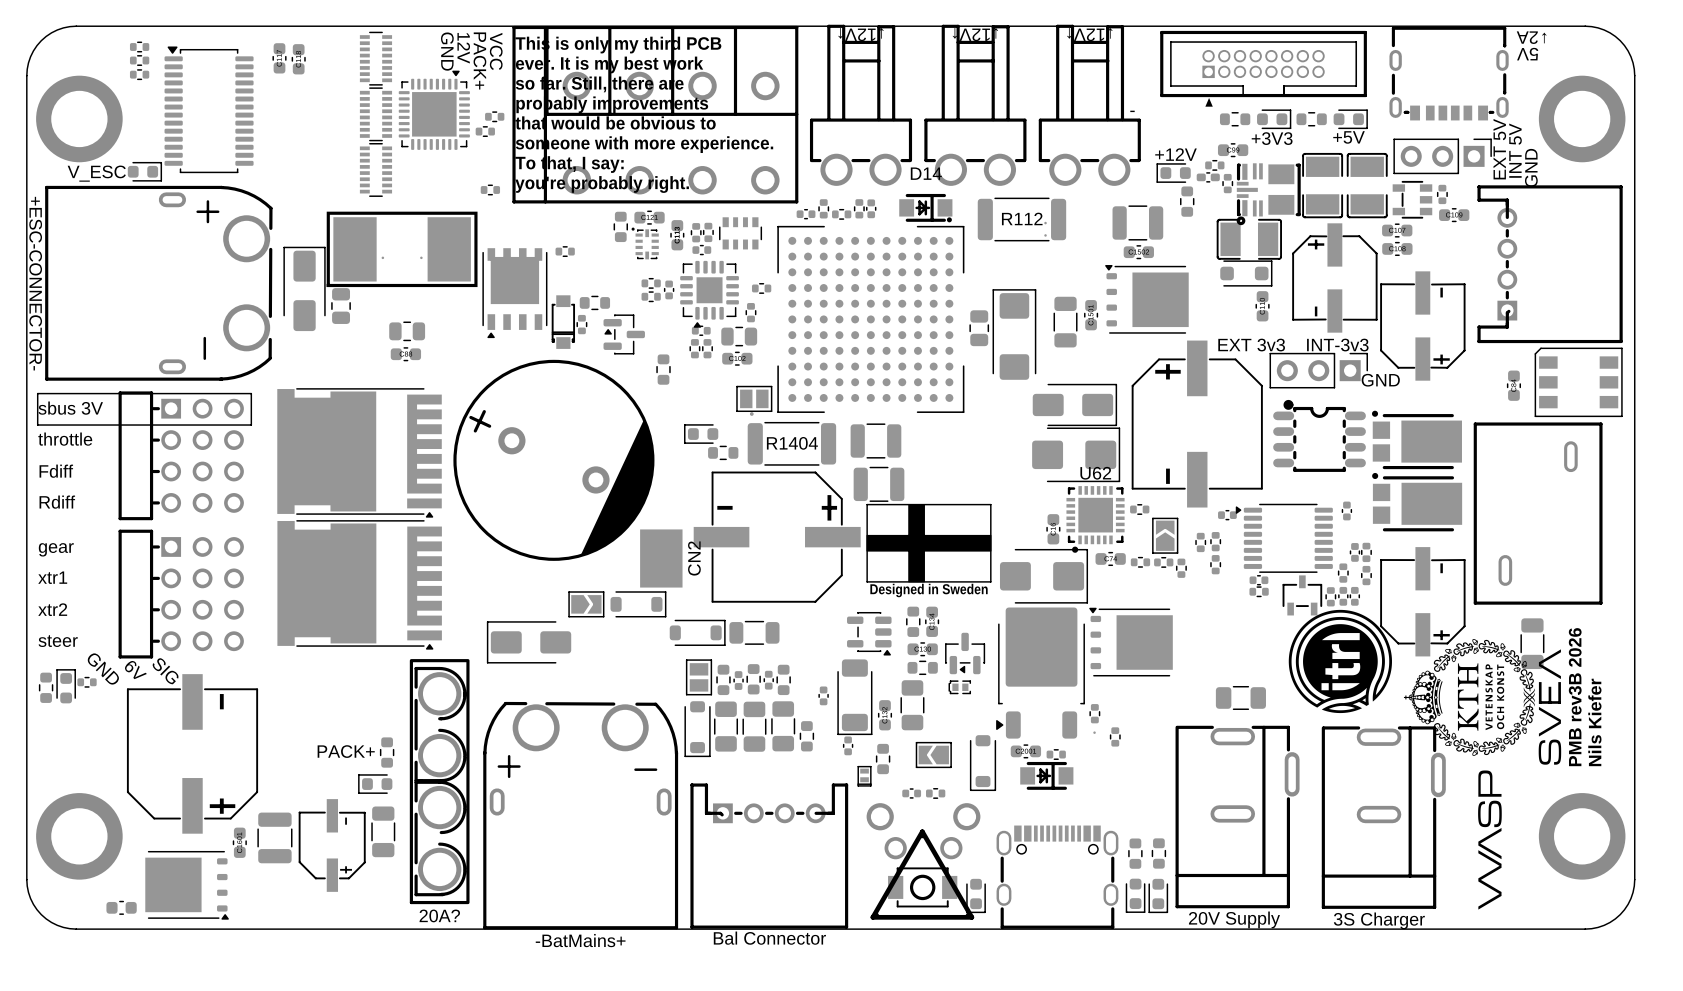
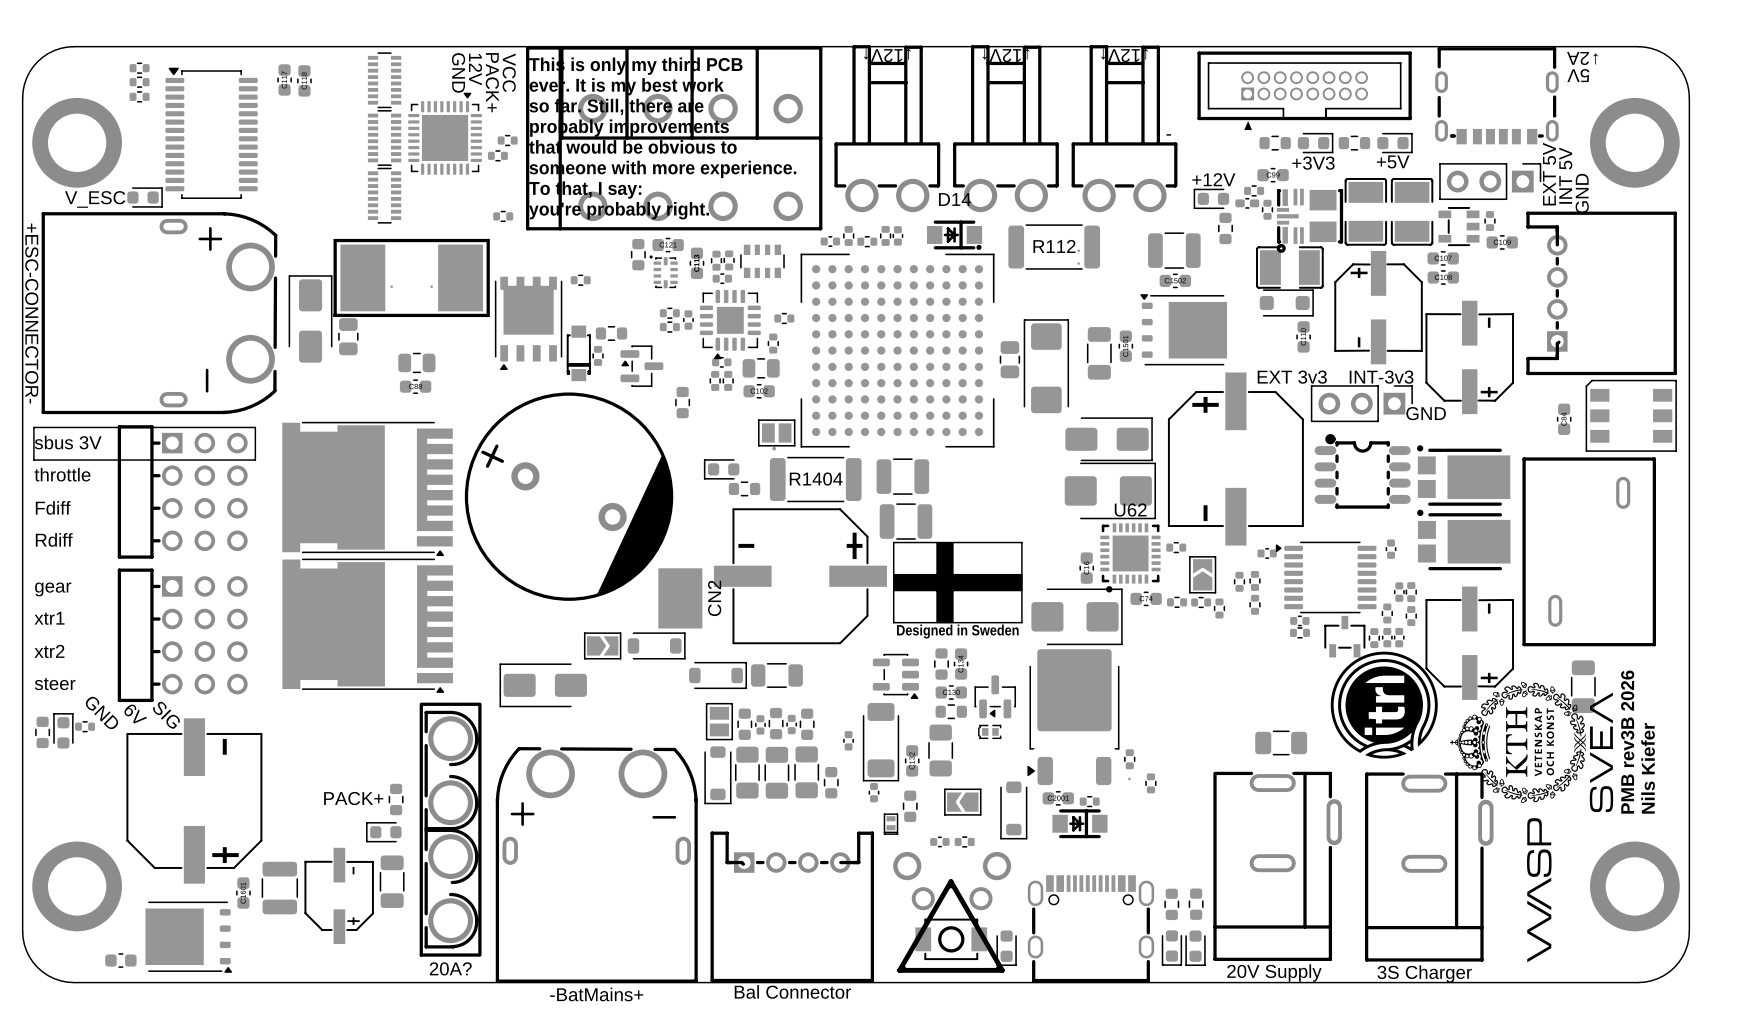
part: (1131, 642) -> none

